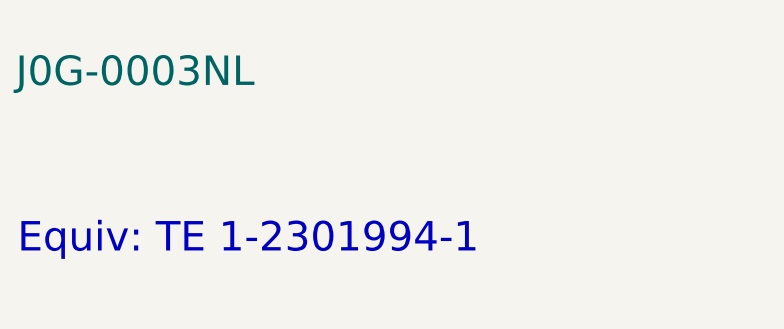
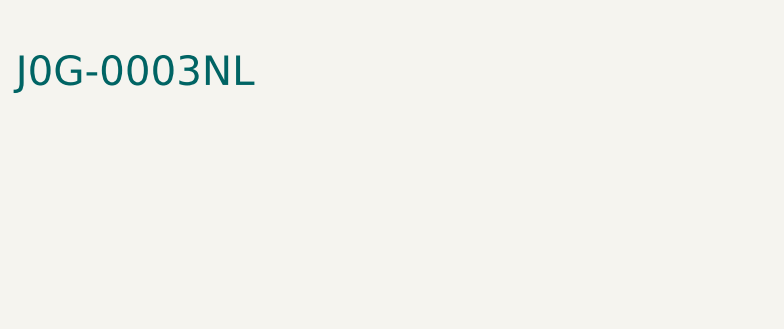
text: Equiv: TE 1-2301994-1 (248, 239) -> none

